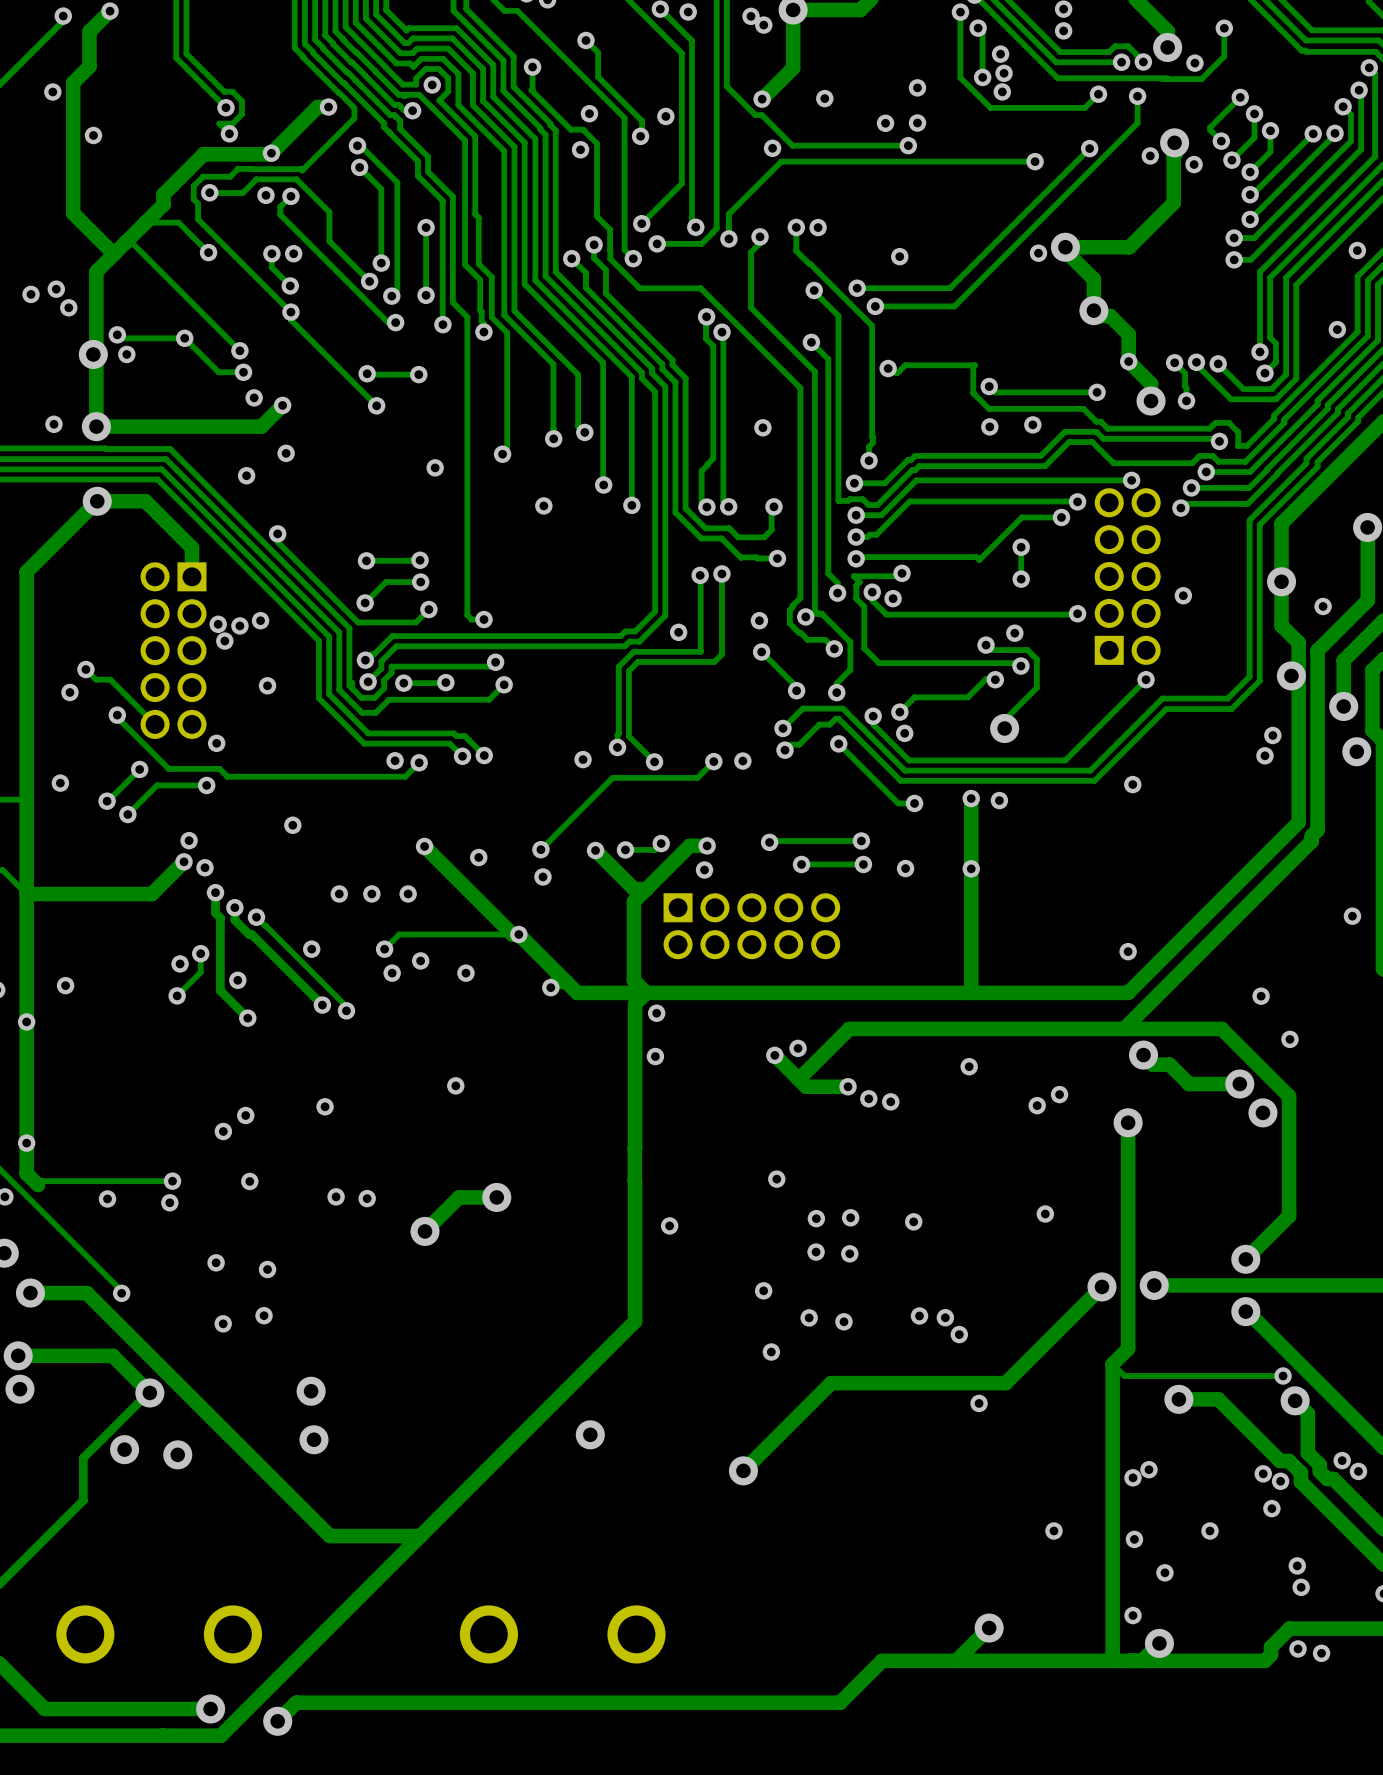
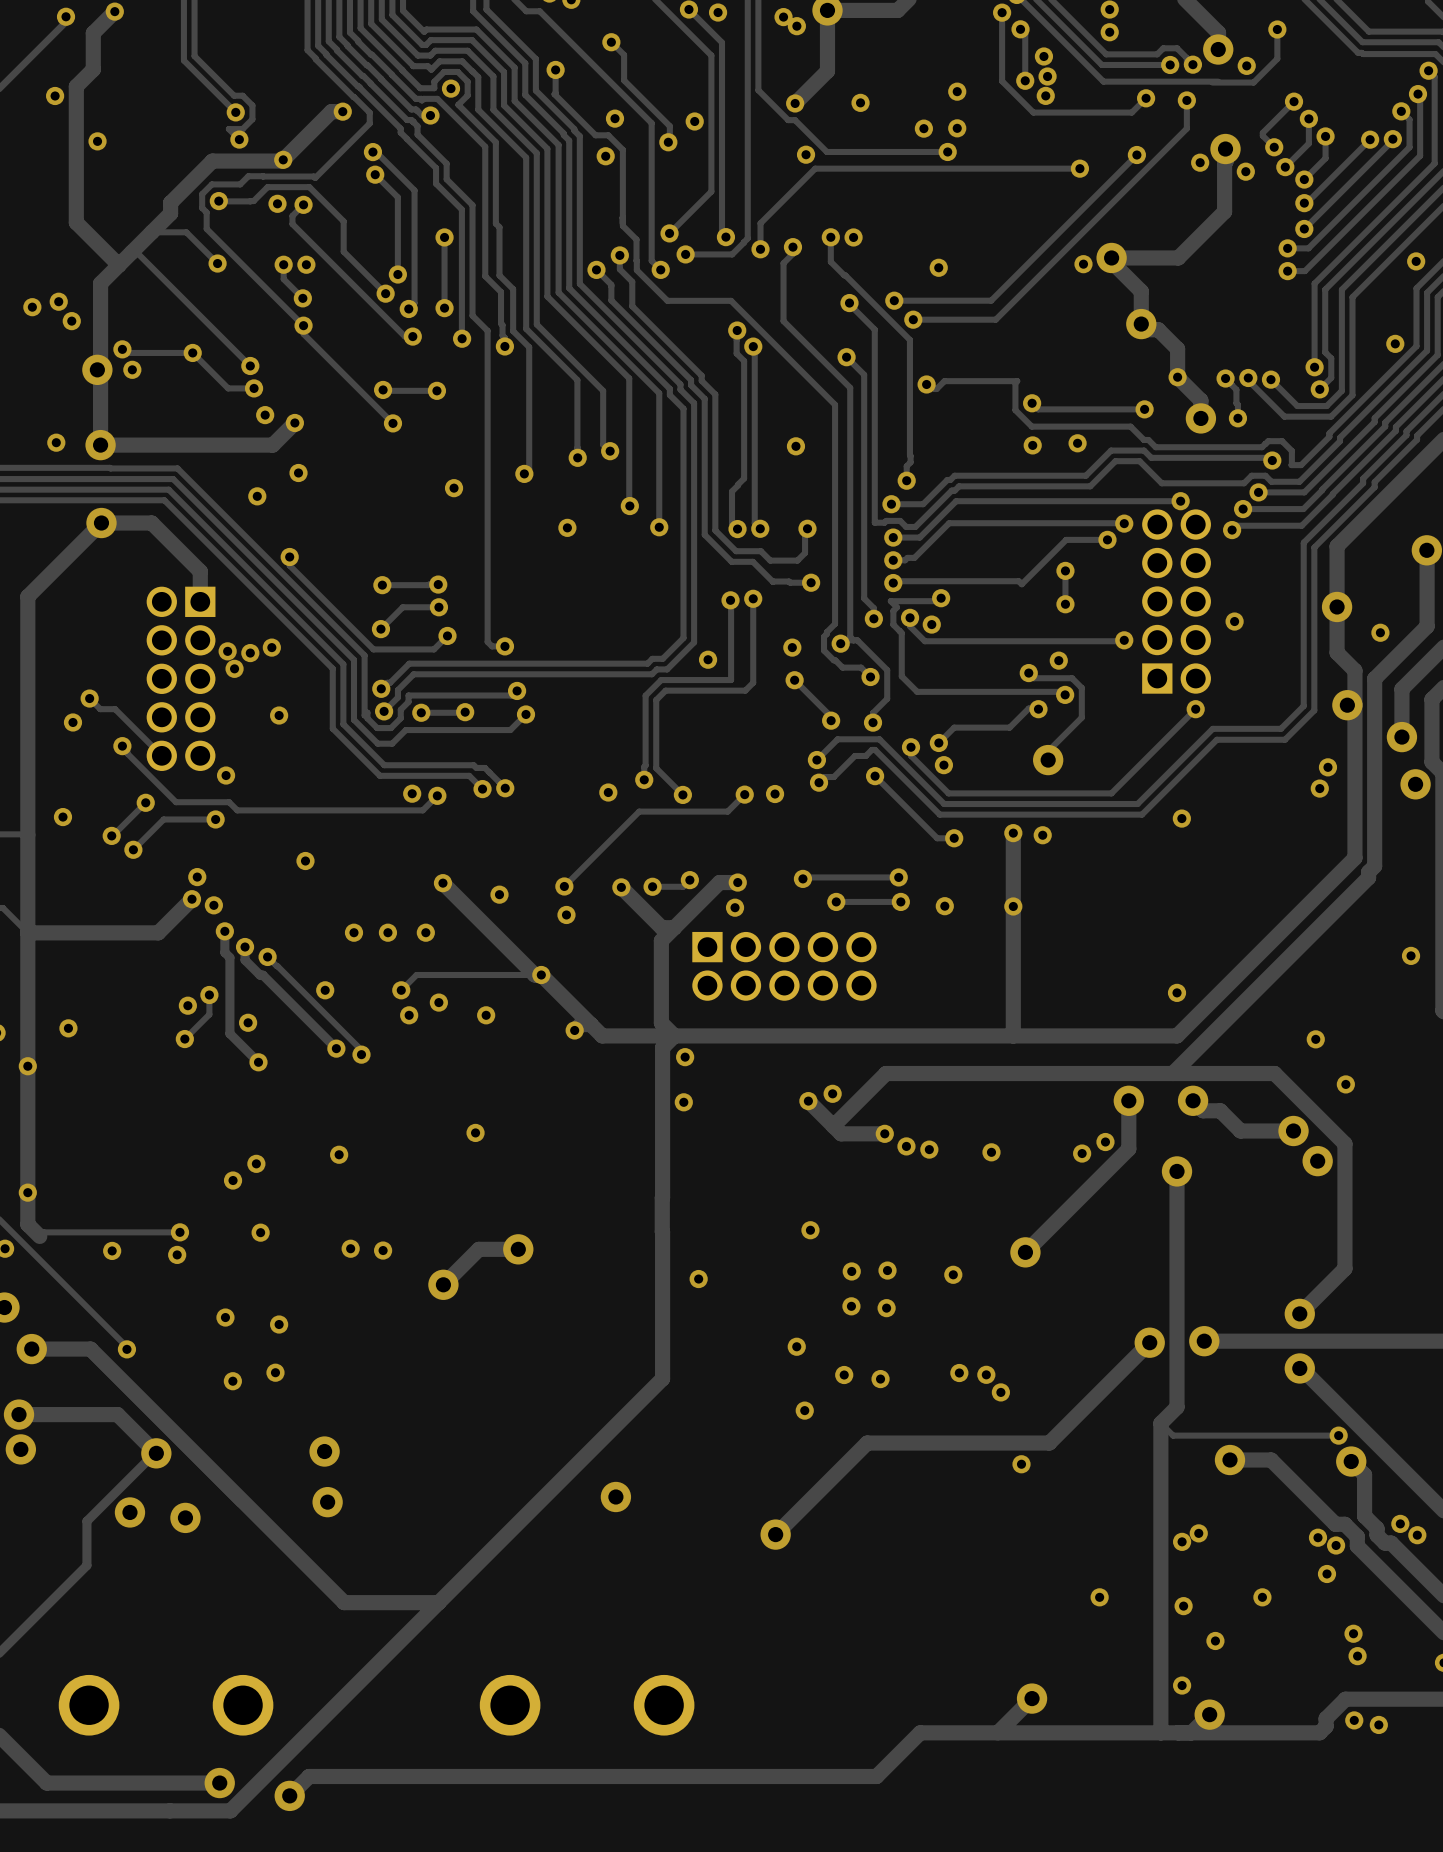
track: none -> (1128, 1100) (1128, 1148) (1025, 1252)
via: none -> (1128, 1100)
via position: (969, 1066) -> (991, 1152)
via: none -> (1025, 1252)
via: (1045, 1214) -> none

